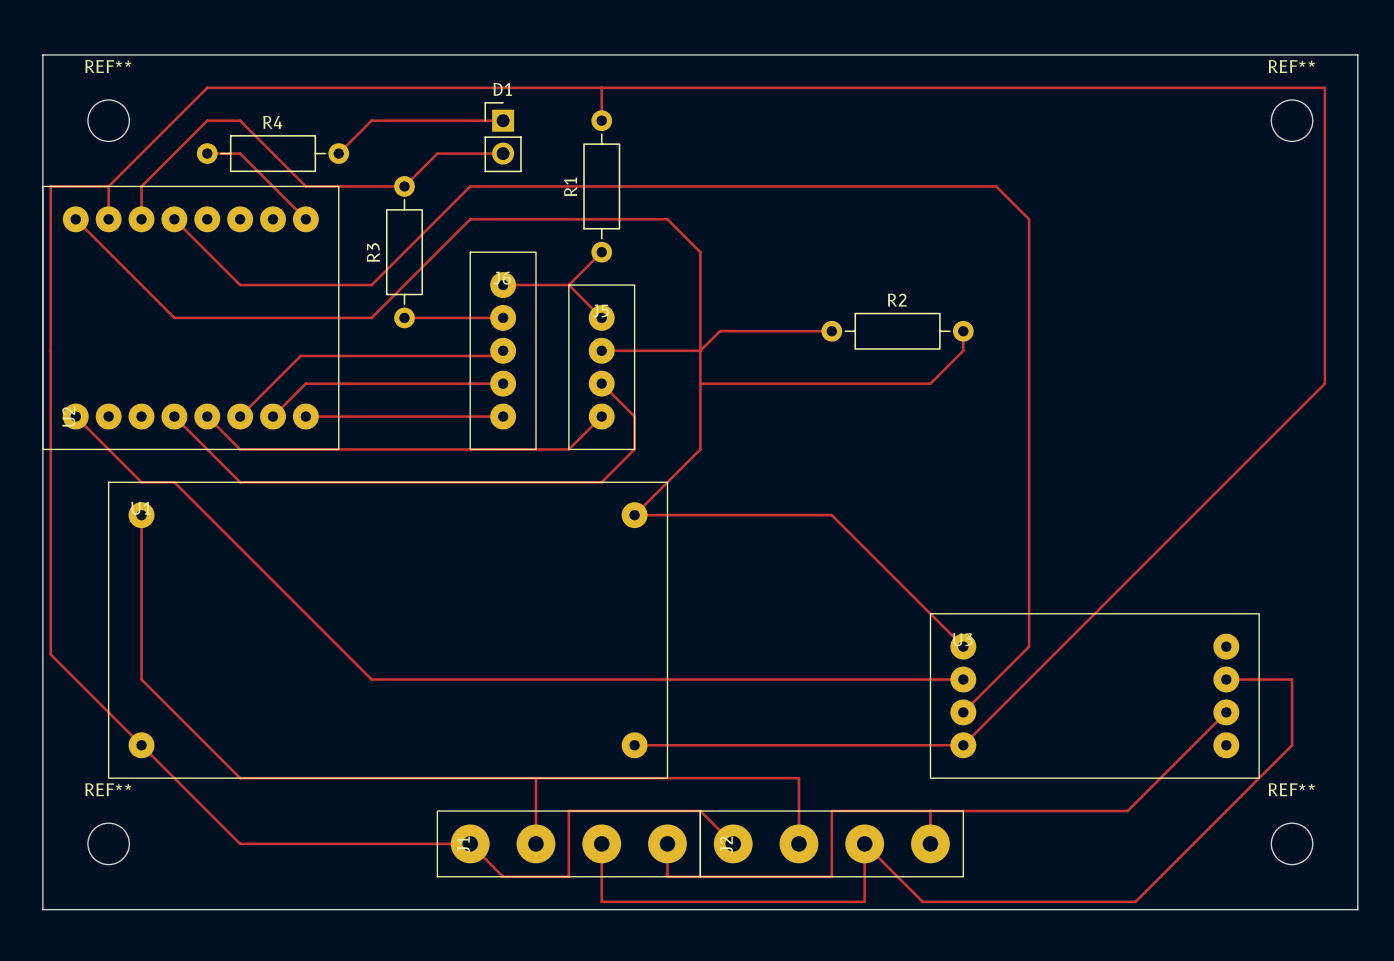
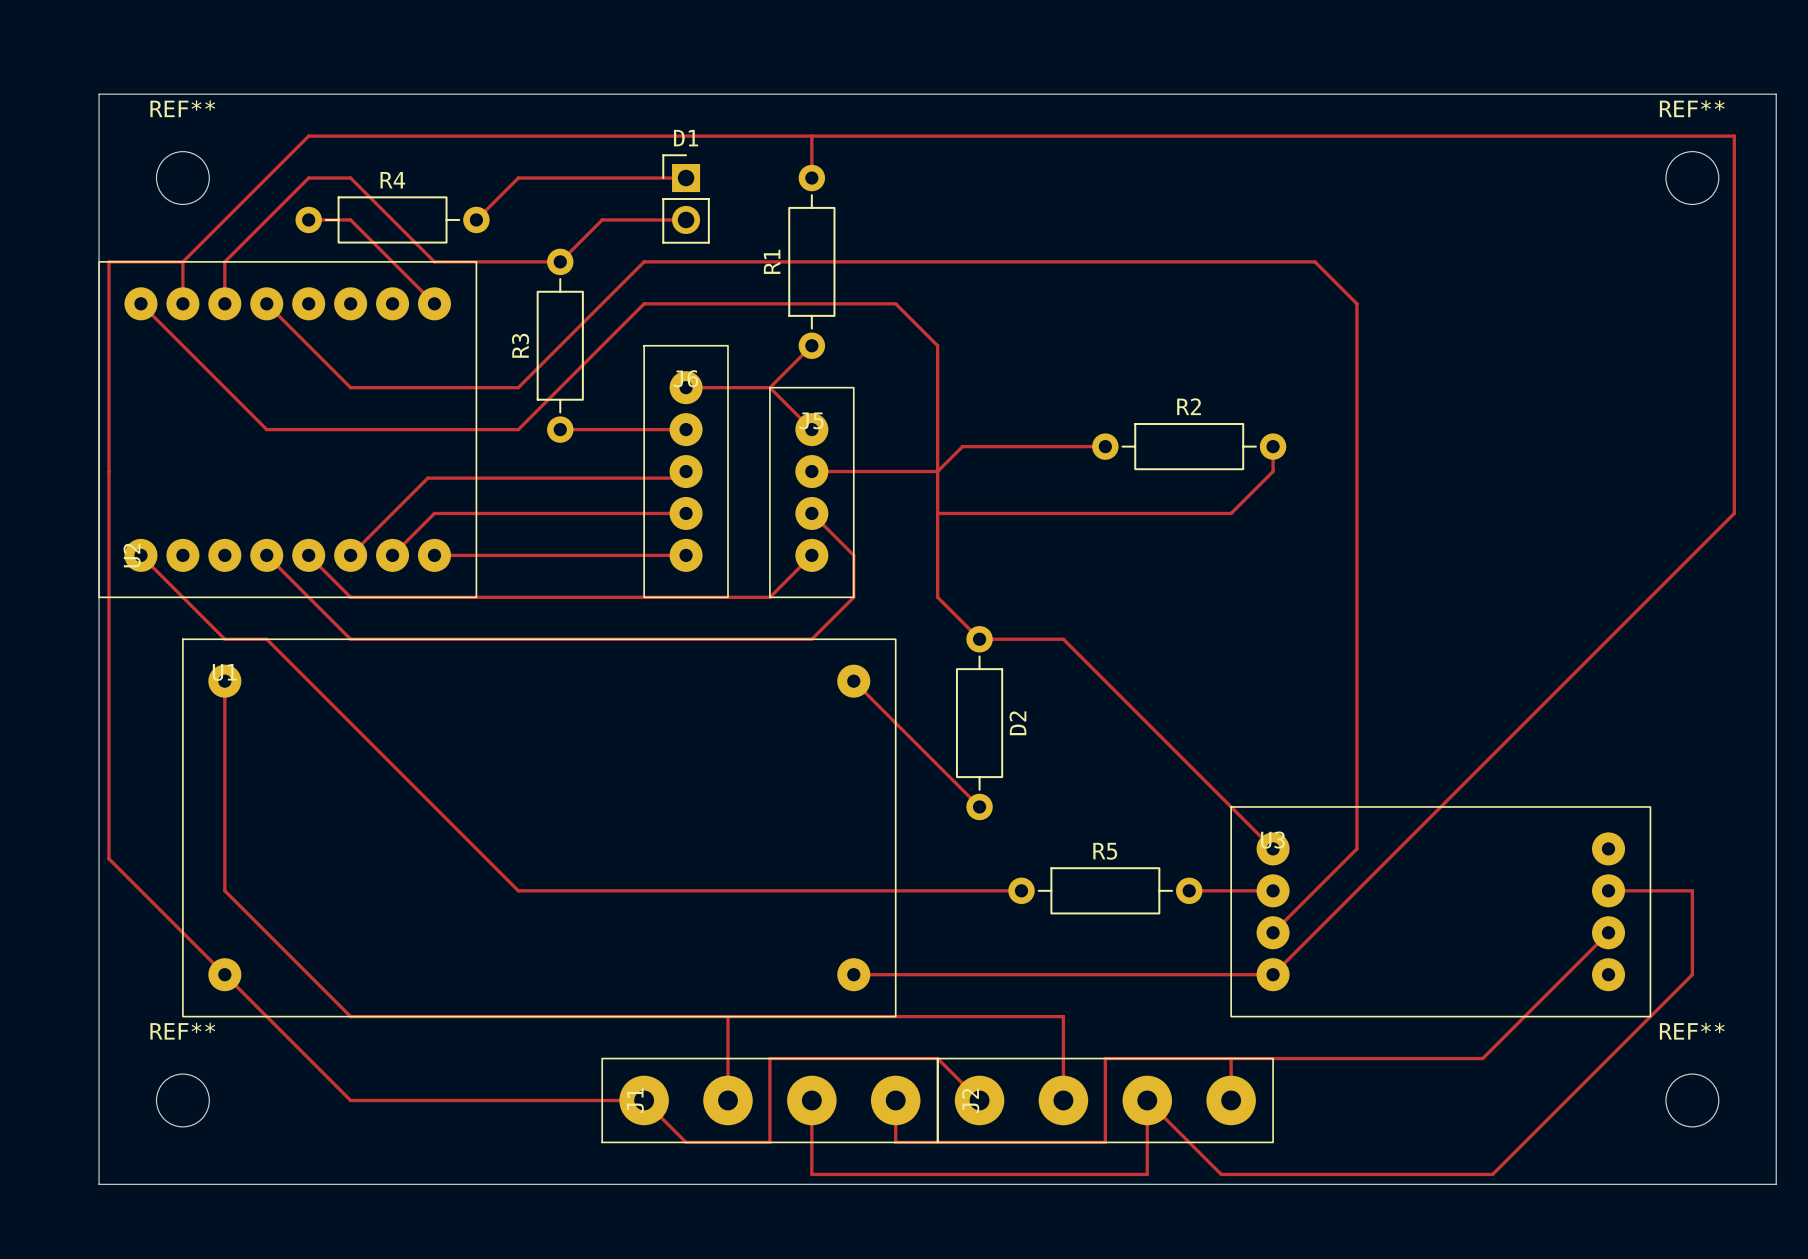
track: (700, 449) (634, 515) (831, 515) -> (937, 597) (979, 639) (1063, 639) (1105, 681)
track: none -> (853, 681) (979, 806)
D2: none -> (979, 723)
track: (766, 679) (897, 679) -> none
R5: none -> (1105, 890)

